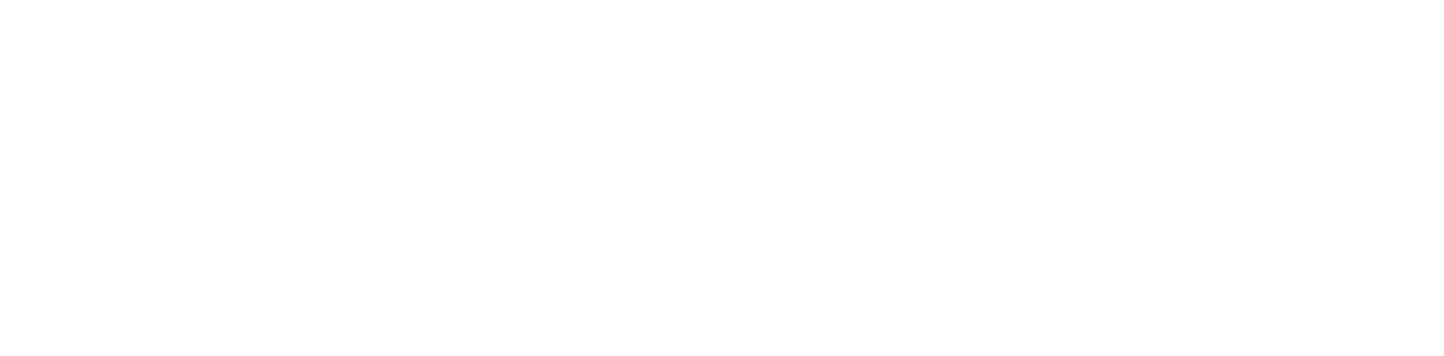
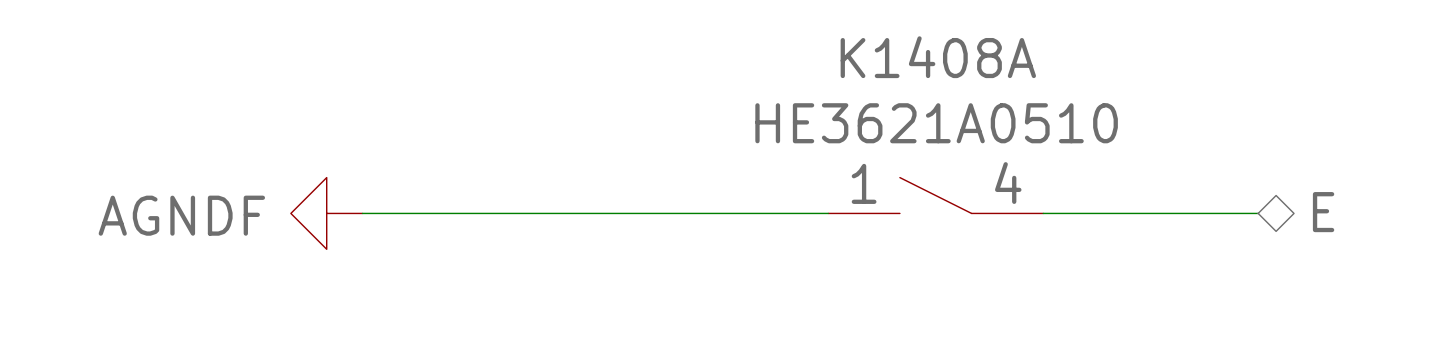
K1408A: none -> HE3621A0510 (935, 195)
hierarchical label: none -> E (1323, 212)
power symbol: none -> AGNDF (326, 213)
wire: none -> (362, 213) (828, 213)
wire: none -> (1043, 213) (1258, 213)

